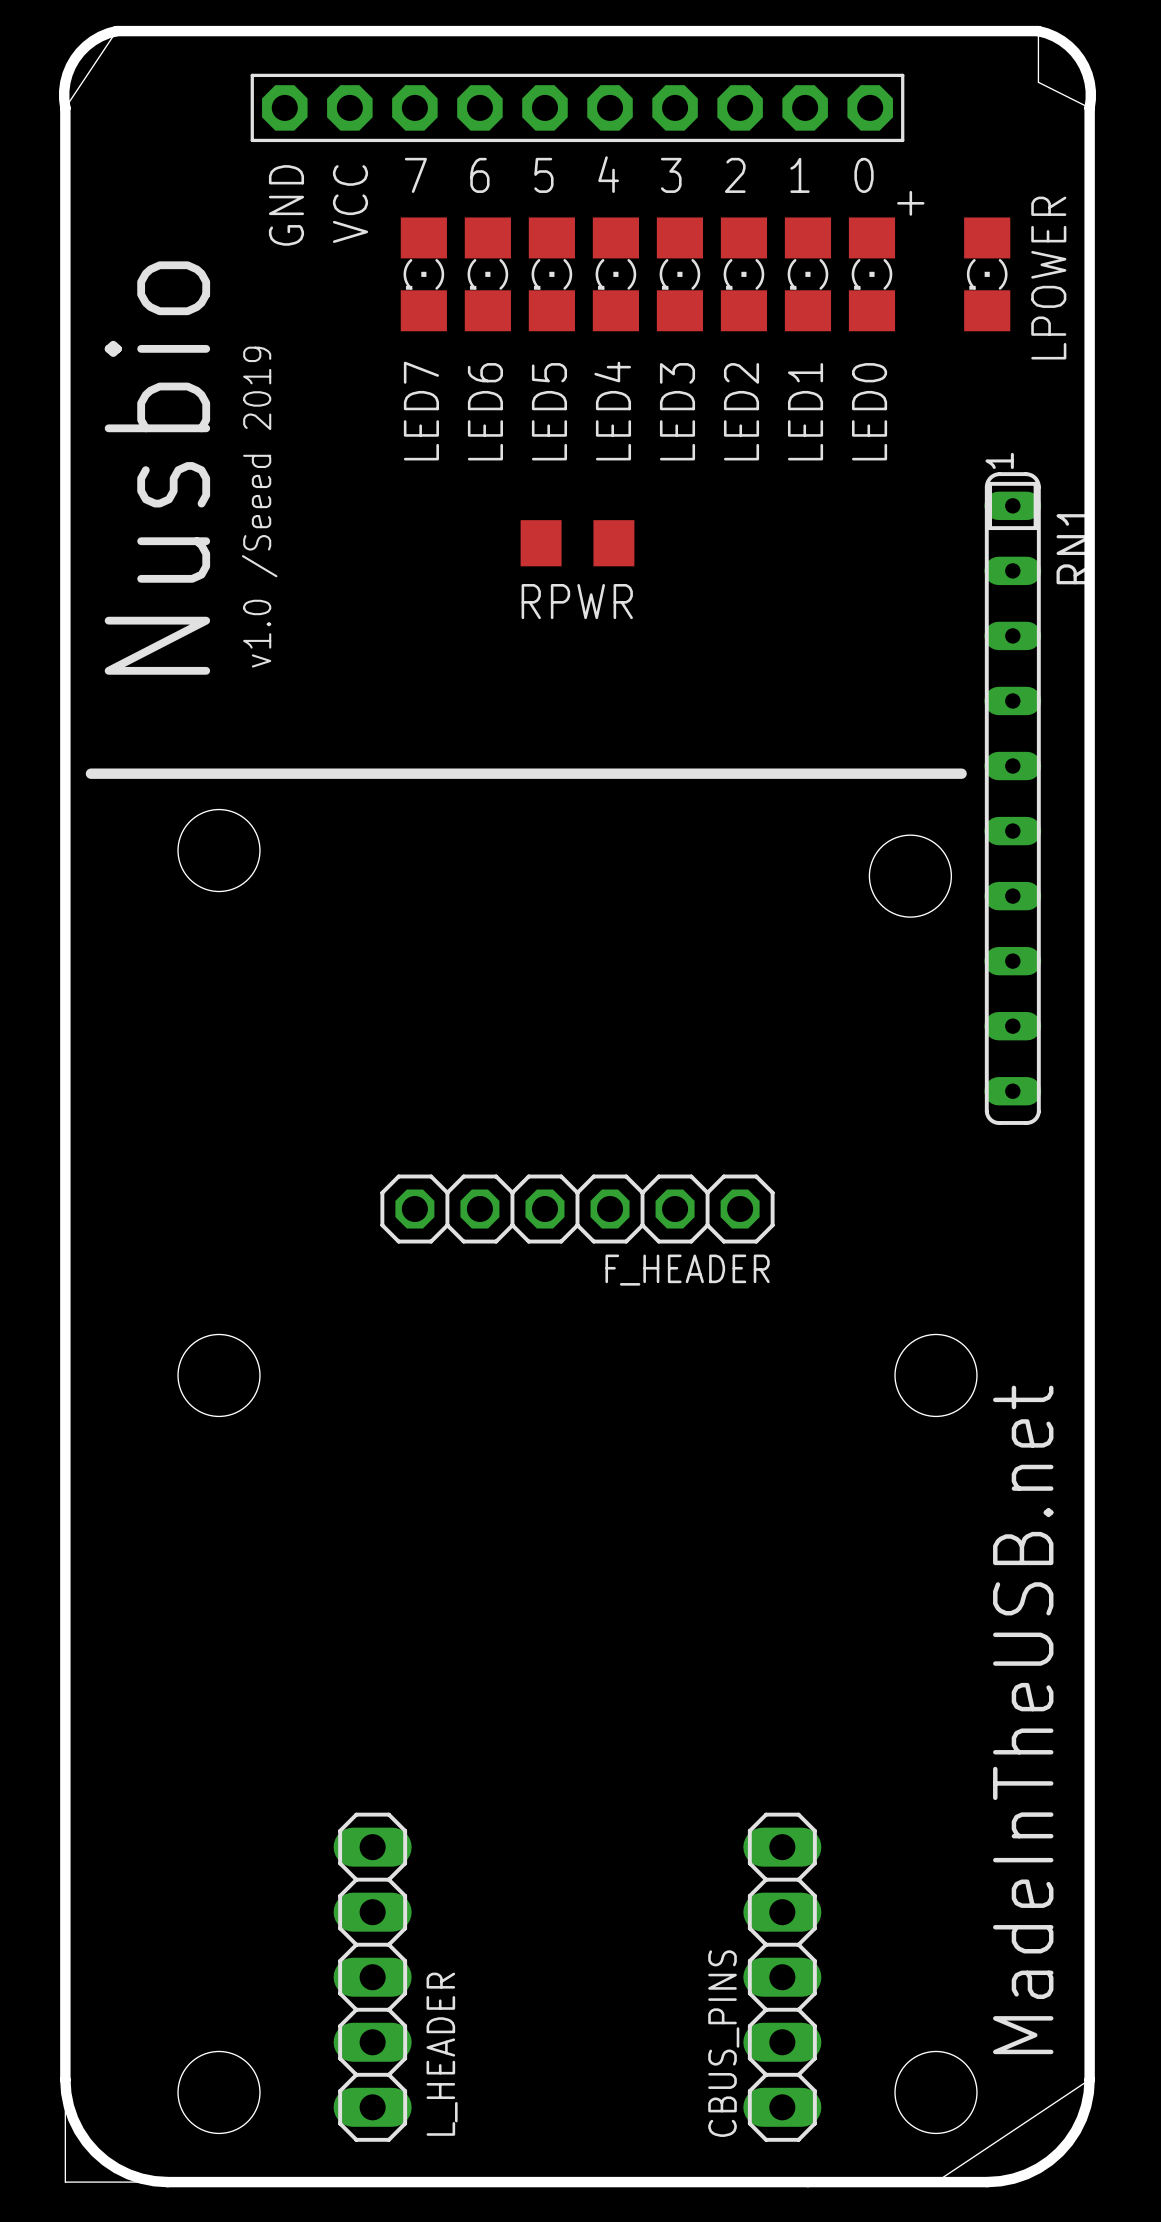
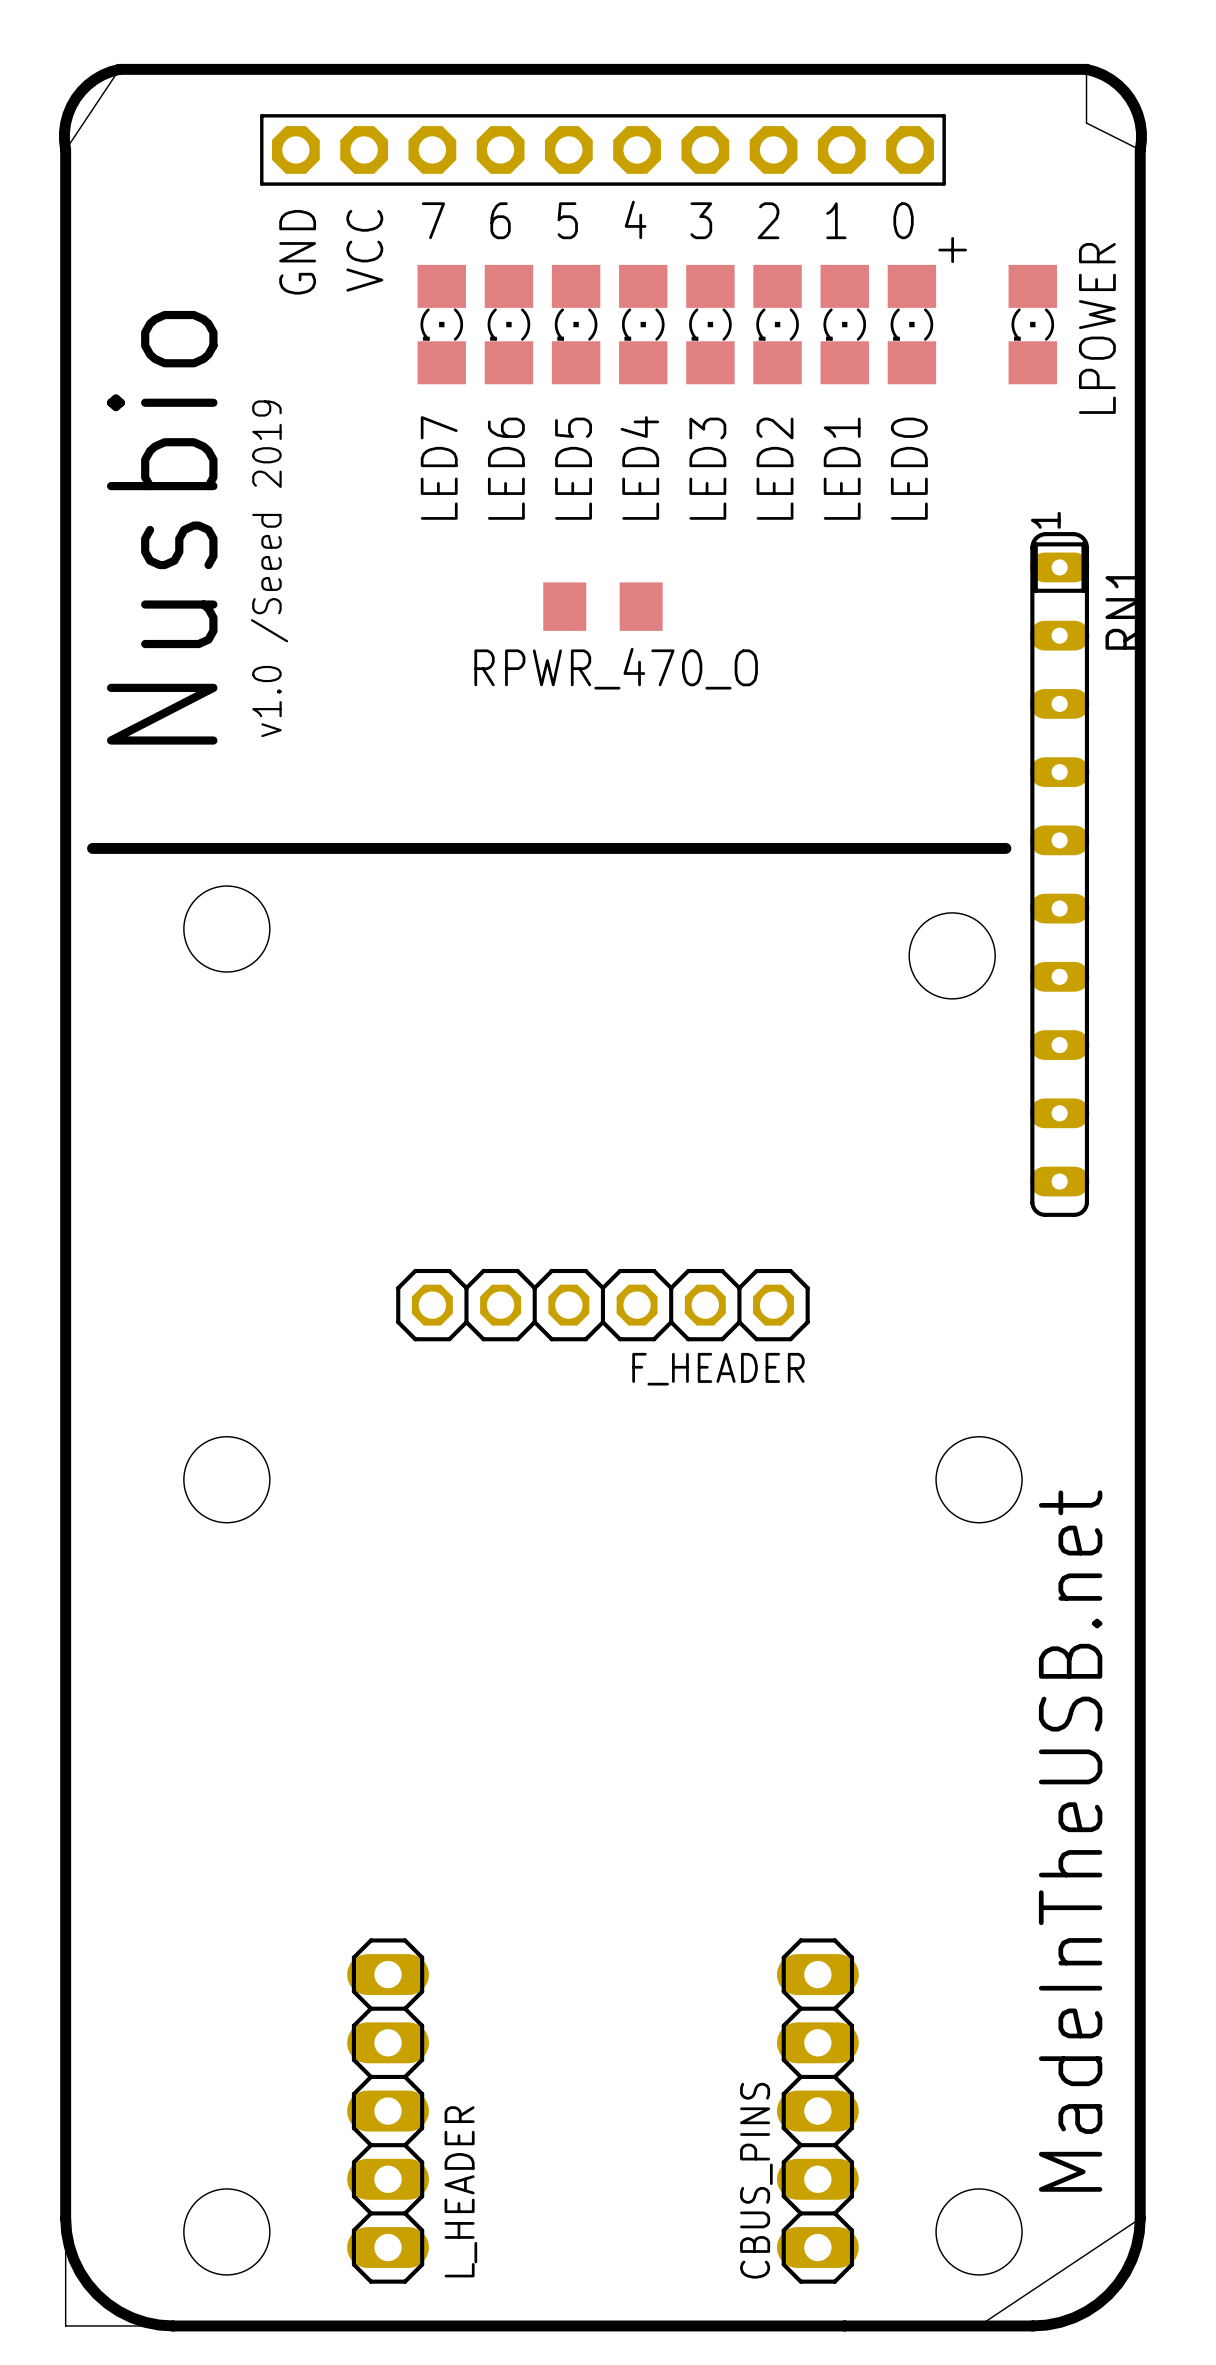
RPWR name: RPWR (577, 601) -> RPWR_470_O (616, 668)

